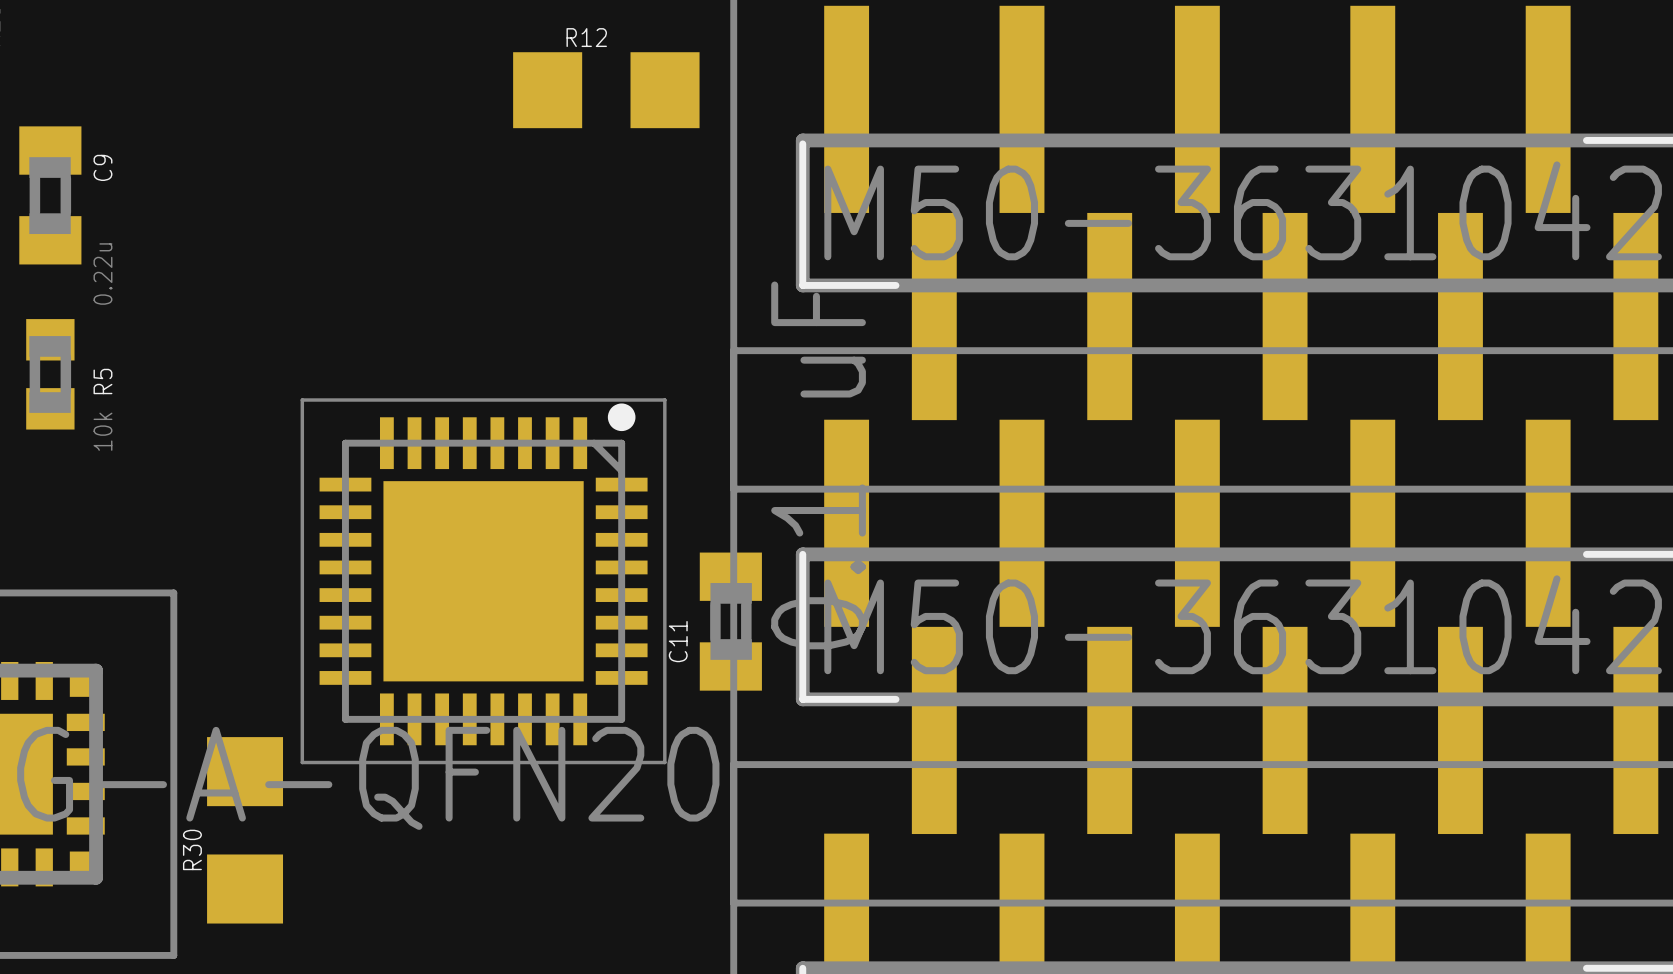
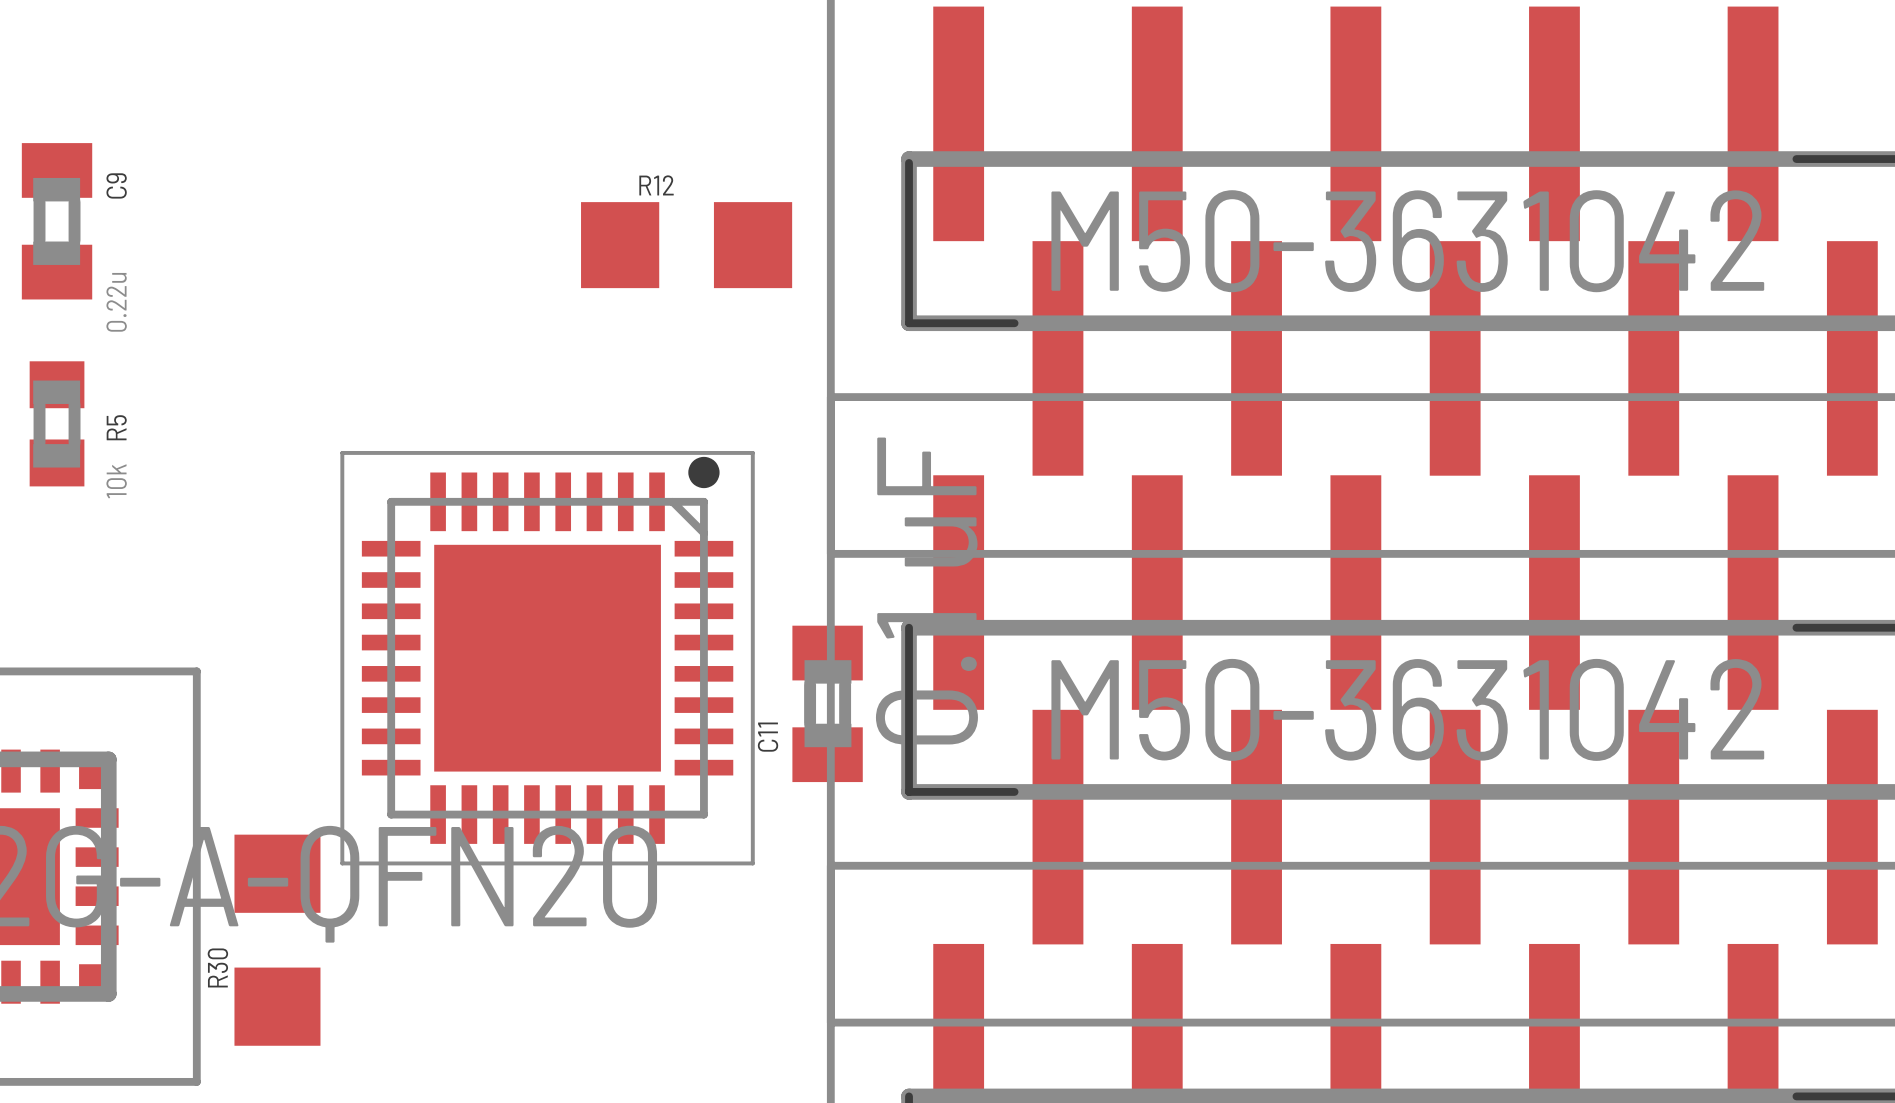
R12 position: (606, 90) -> (686, 245)

